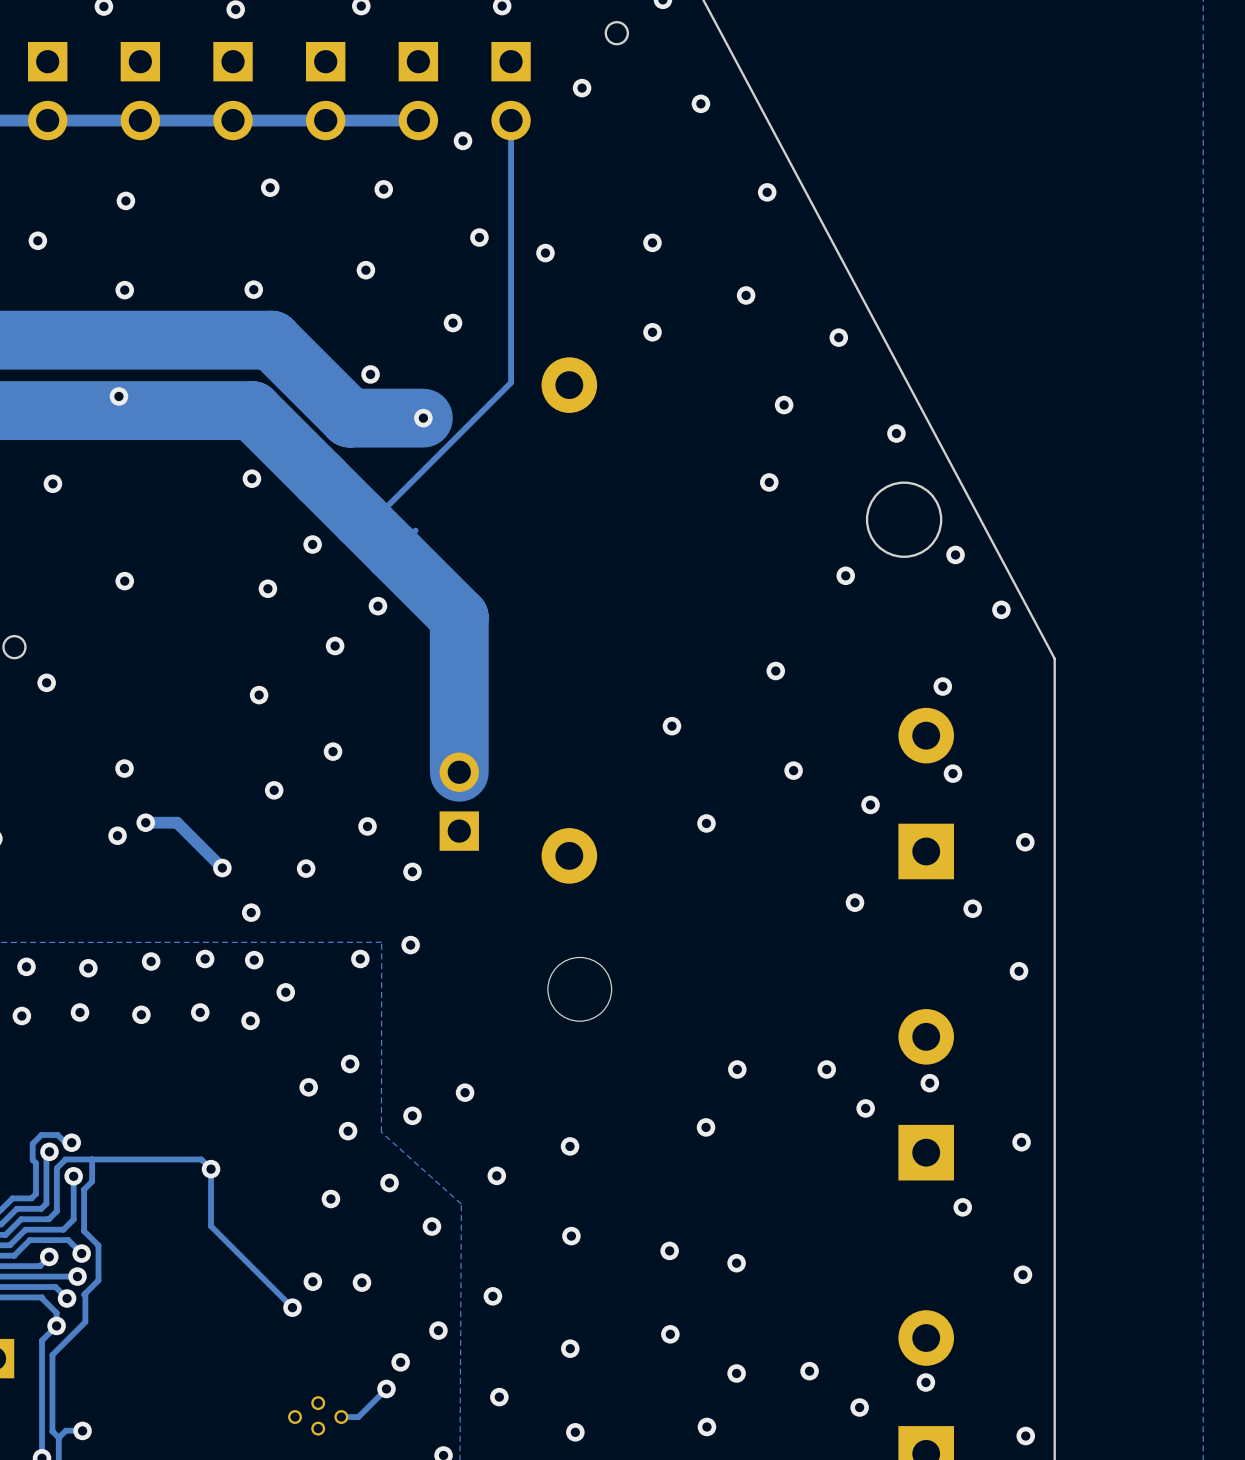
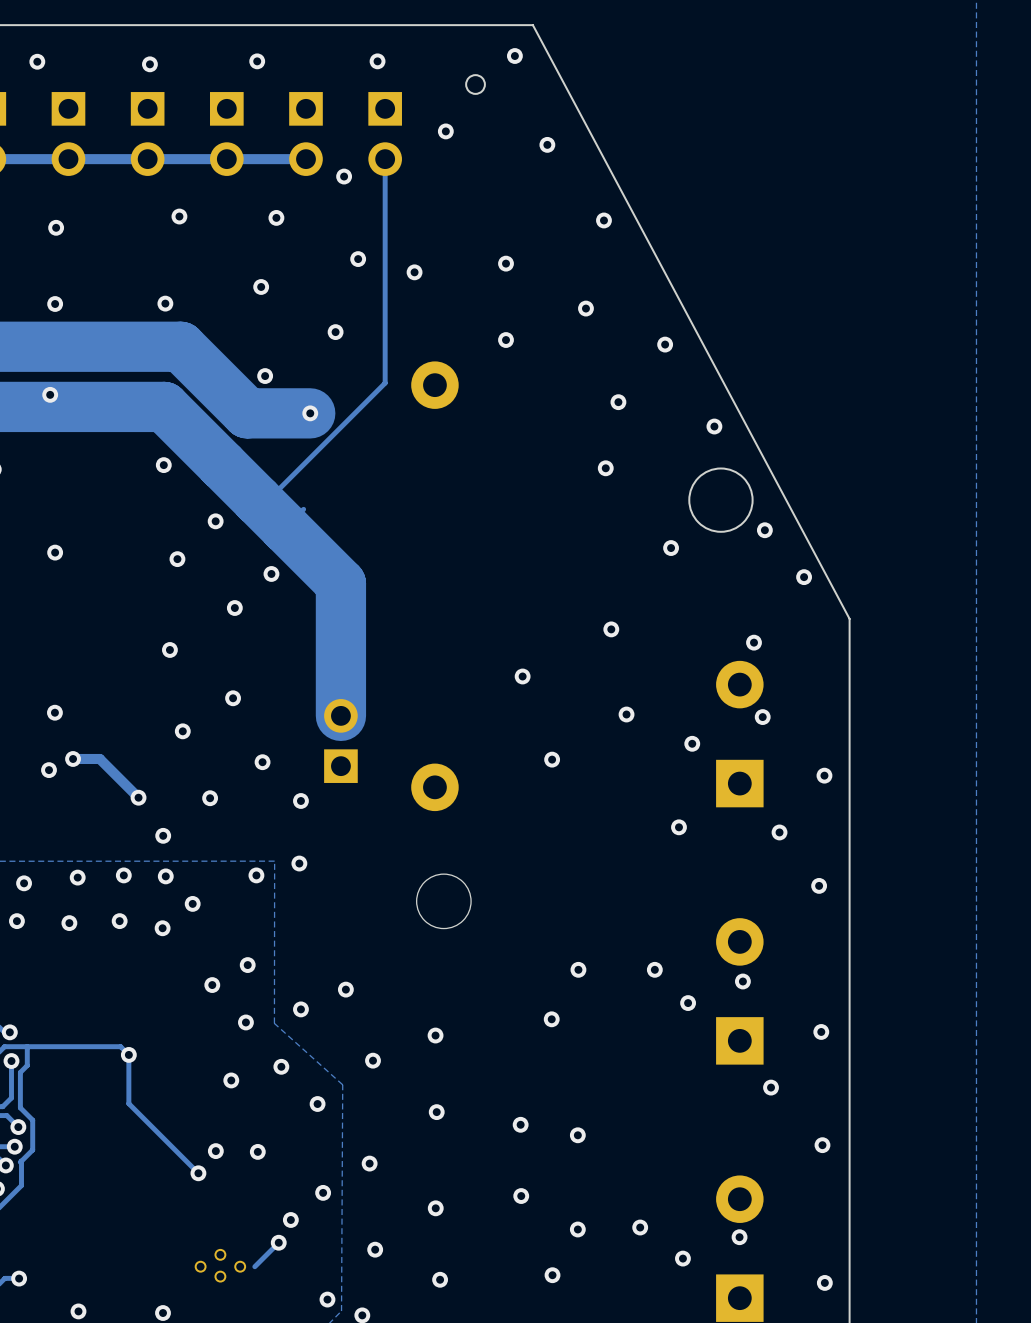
track: (358, 1417) (341, 1417) -> none

